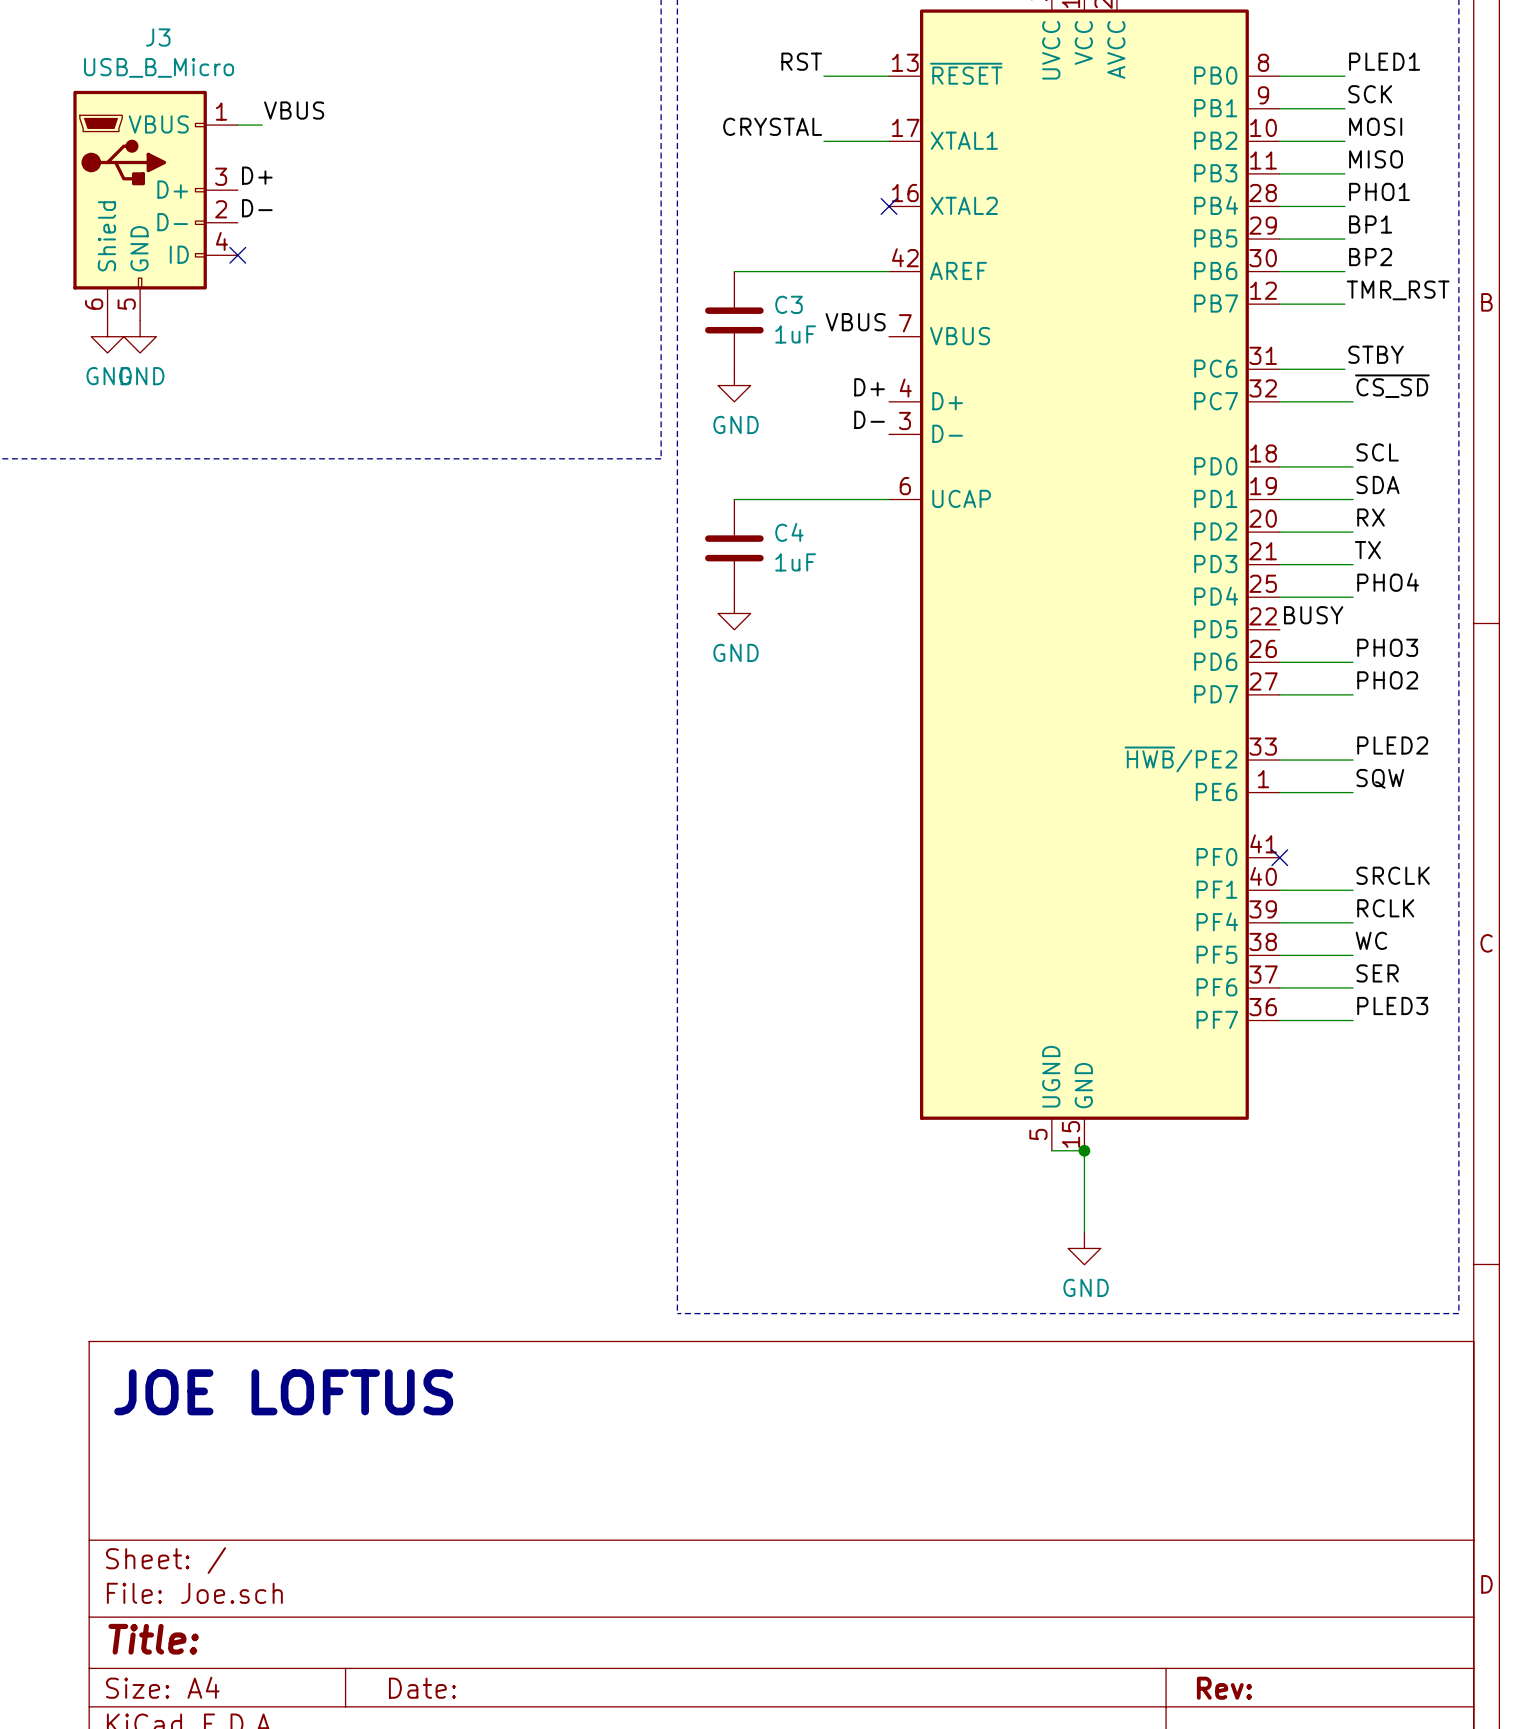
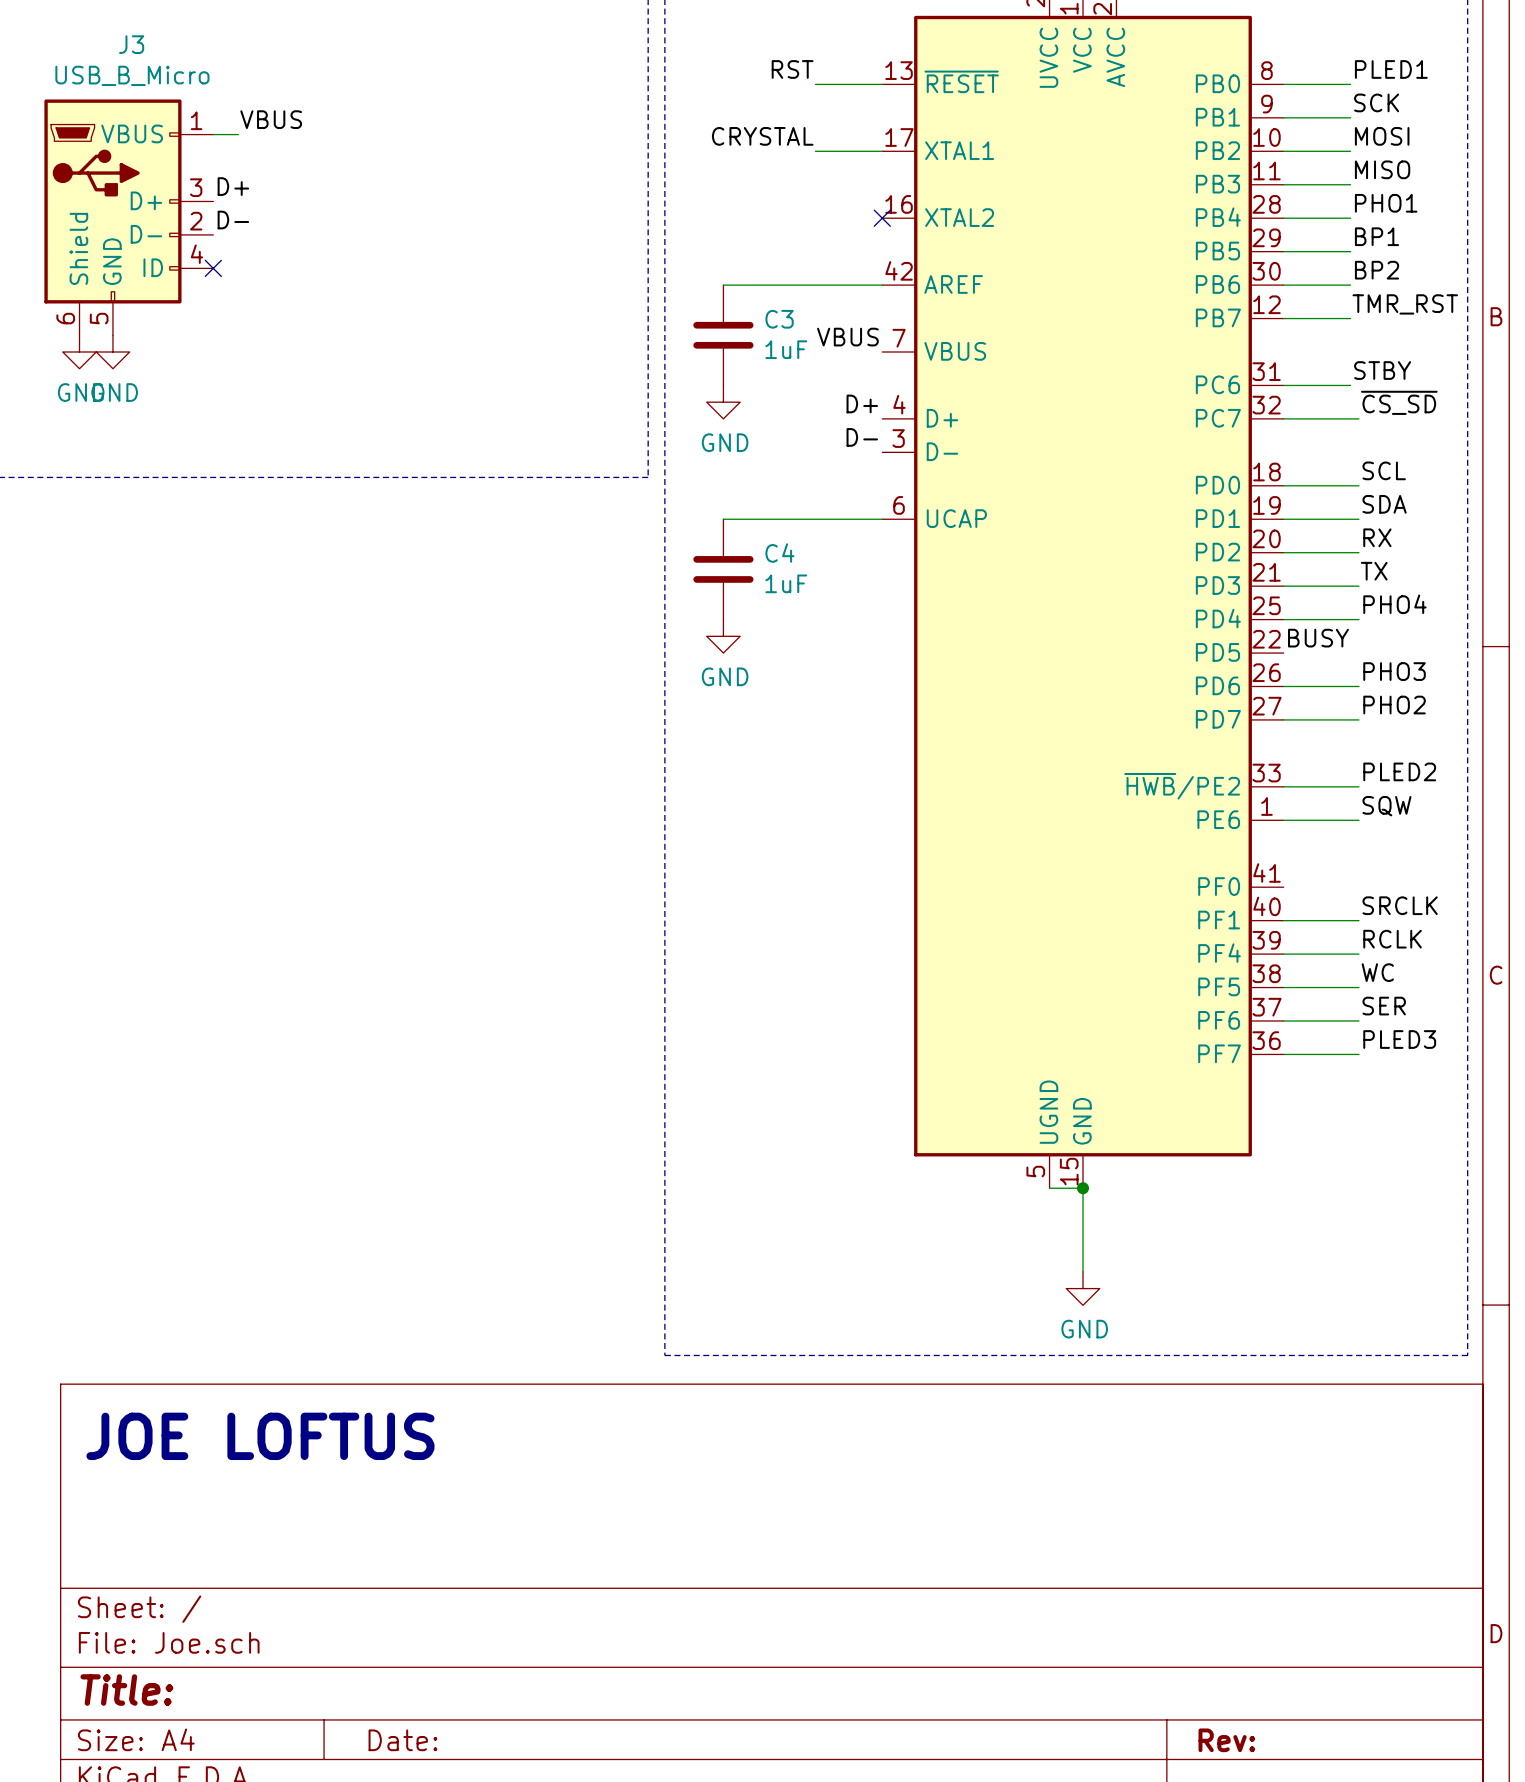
no-connect mark: (1279, 857) -> none

